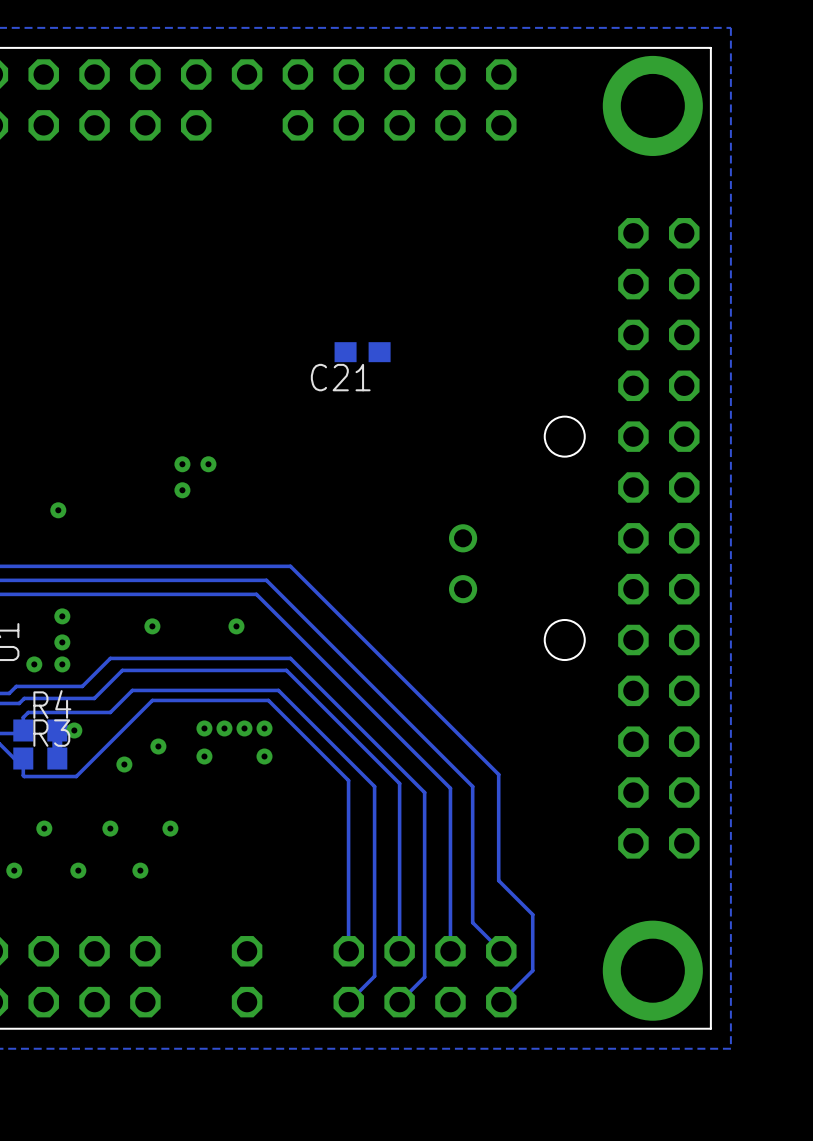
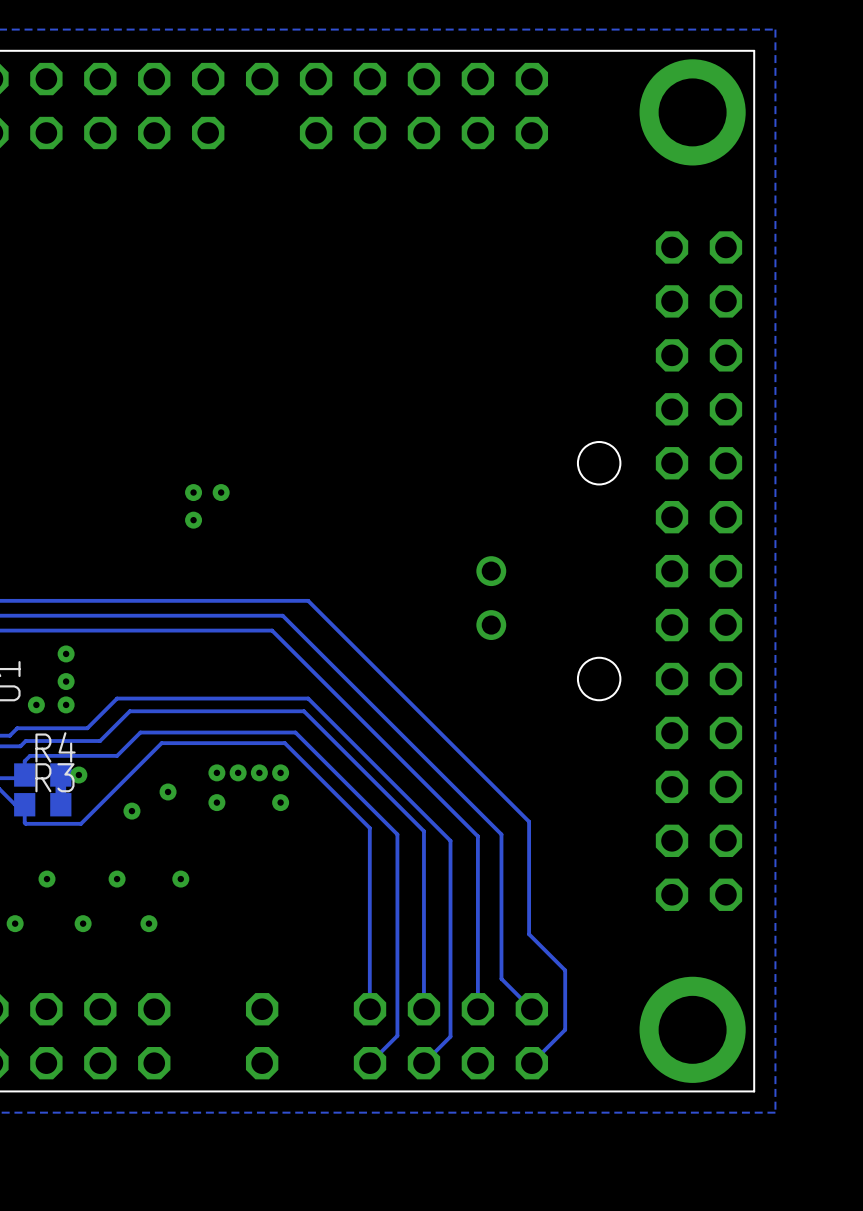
C21: (362, 352) -> none
via: (58, 510) -> none
via: (152, 626) -> none
via: (236, 626) -> none

